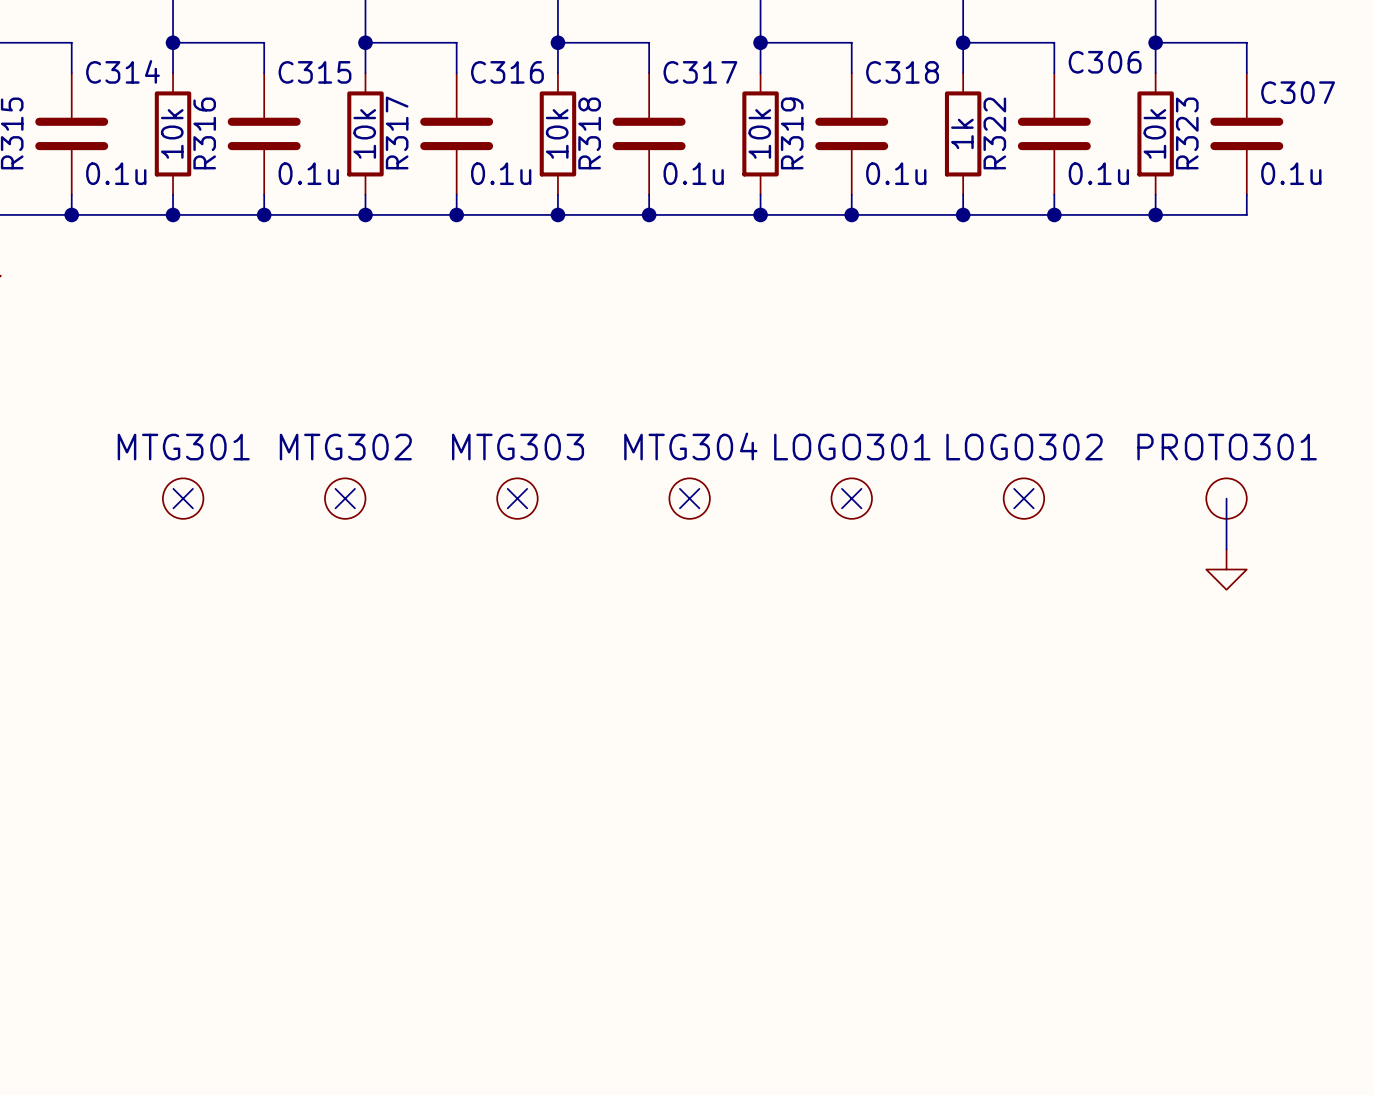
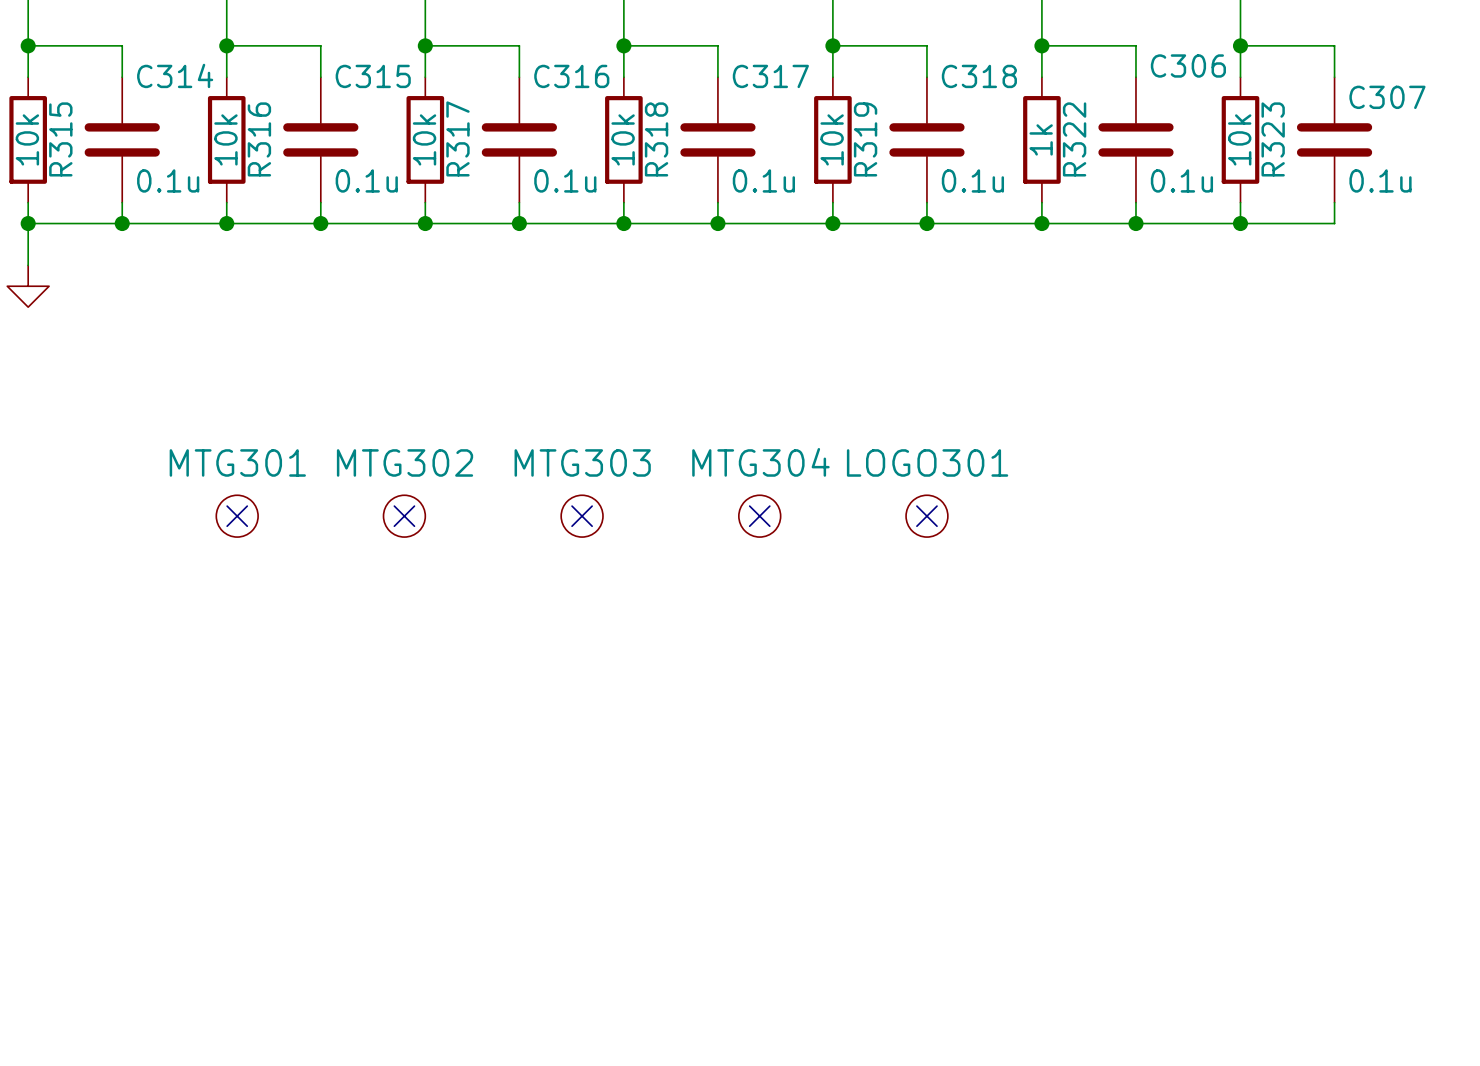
LOGO302: (1023, 498) -> none
no-connect mark: (1023, 498) -> none
wire: (1226, 498) (1226, 549) -> none
PROTO301: (1226, 498) -> none
power symbol: (1226, 569) -> none

